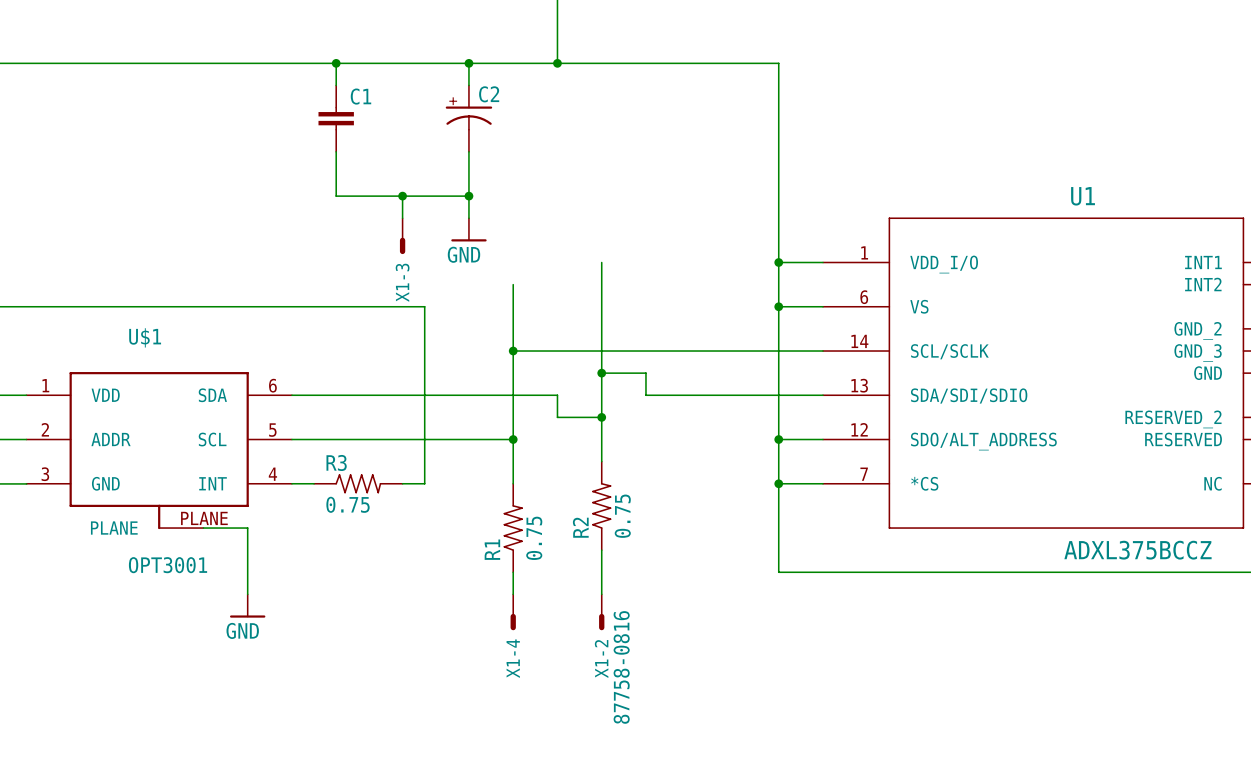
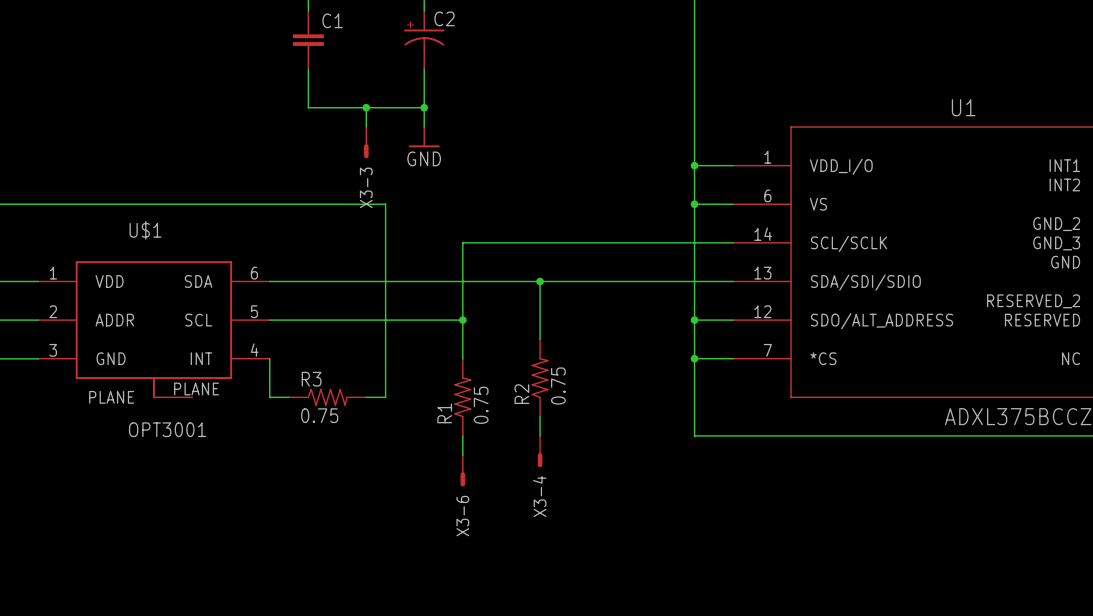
wire: (601, 262) (601, 395) -> none
X1-3 name: X1-3 (402, 282) -> X3-3 (366, 187)
wire: (513, 284) (513, 351) -> none
junction: (513, 351) -> none
wire: (601, 373) (645, 373) (645, 395) -> (501, 281) (578, 281)
junction: (601, 373) -> none
wire: (557, 395) (557, 417) (601, 417) -> none
junction: none -> (540, 281)
junction: (601, 417) -> none
wire: (291, 483) (314, 483) -> (269, 358) (269, 397) (289, 397)
R3 position: (358, 483) -> (327, 397)
wire: (402, 483) (424, 483) -> (366, 397) (385, 397) (385, 358)
wire: (203, 528) (247, 528) (247, 594) -> none
X3-4: none -> (540, 451)
power symbol: GND (247, 606) -> none
X1-2: 87758-0816 (601, 612) -> none
X1-4 name: X1-4 (513, 658) -> X3-6 (462, 516)

